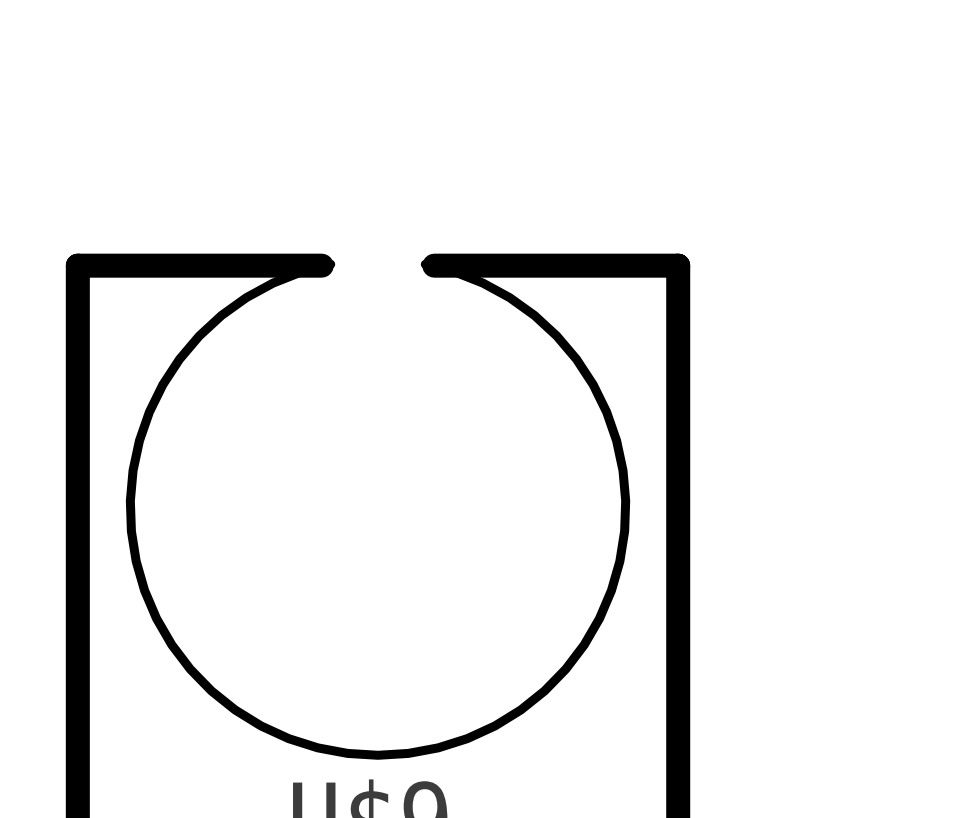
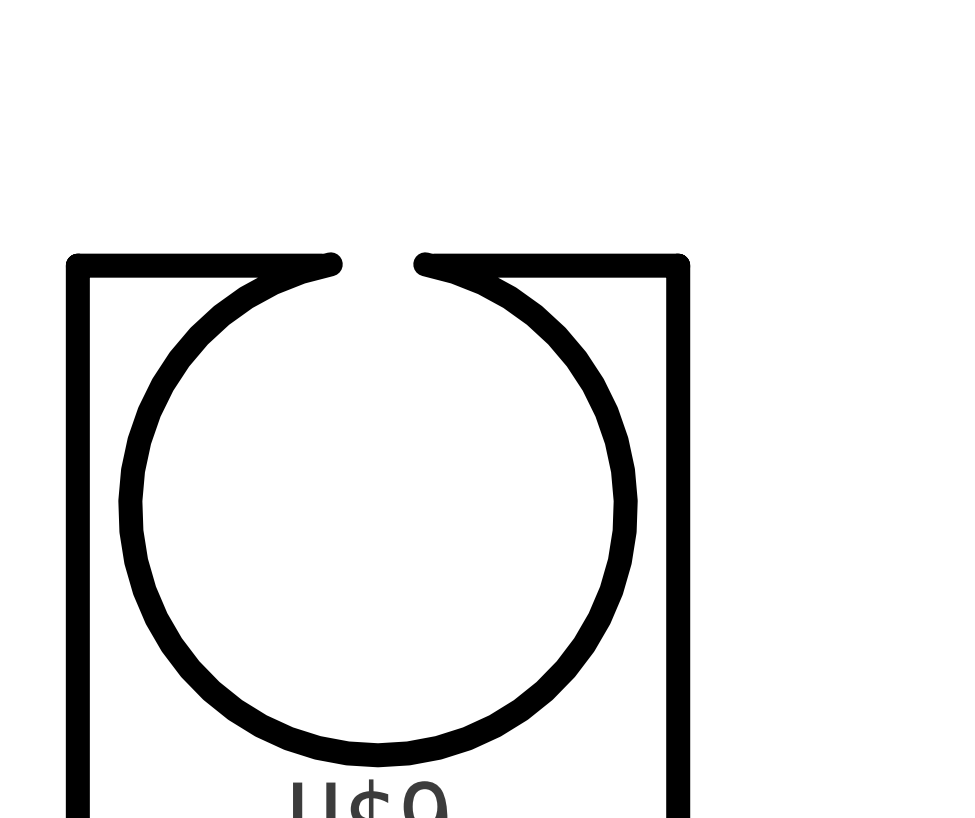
board edge width: thin (330, 264) (301, 271) (272, 283) (246, 297) (221, 315) (199, 336) (179, 359) (162, 384) (149, 412) (139, 440) (133, 470) (130, 500) (131, 531) (136, 561) (144, 590) (156, 618) (171, 644) (190, 669) (211, 690) (235, 709) (261, 725) (288, 738) (317, 747) (347, 753) (378, 755) (408, 753) (438, 747) (467, 738) (494, 725) (520, 709) (544, 690) (565, 669) (584, 644) (599, 618) (611, 590) (619, 561) (624, 531) (625, 500) (623, 470) (616, 440) (606, 412) (593, 384) (576, 359) (556, 336) (534, 315) (509, 297) (483, 283) (454, 271) (425, 264) -> thick (330, 264) (301, 271) (272, 283) (246, 297) (221, 315) (199, 336) (179, 359) (162, 384) (149, 412) (139, 440) (133, 470) (130, 500) (131, 531) (136, 561) (144, 590) (156, 618) (171, 644) (190, 669) (211, 690) (235, 709) (261, 725) (288, 738) (317, 747) (347, 753) (378, 755) (408, 753) (438, 747) (467, 738) (494, 725) (520, 709) (544, 690) (565, 669) (584, 644) (599, 618) (611, 590) (619, 561) (624, 531) (625, 500) (623, 470) (616, 440) (606, 412) (593, 384) (576, 359) (556, 336) (534, 315) (509, 297) (483, 283) (454, 271) (425, 264)

